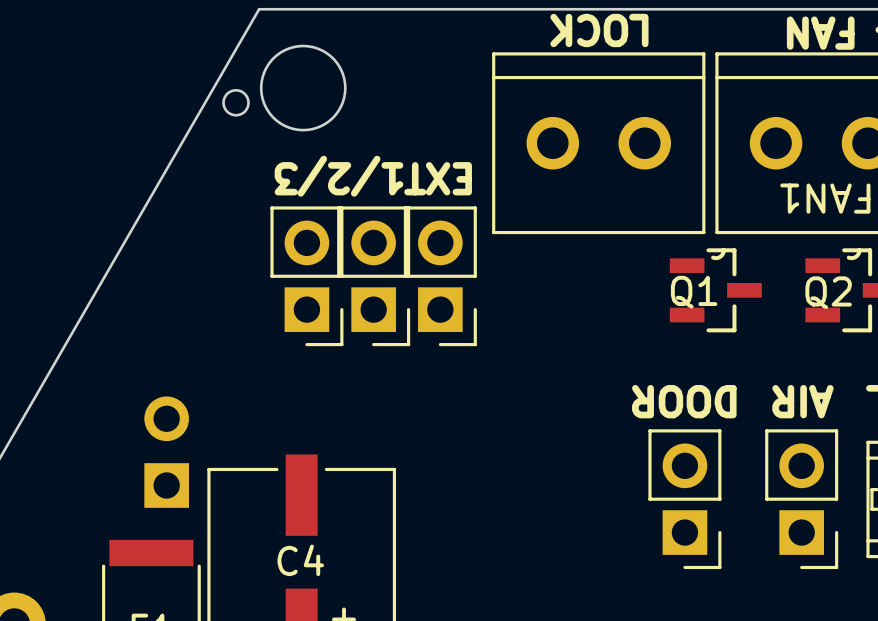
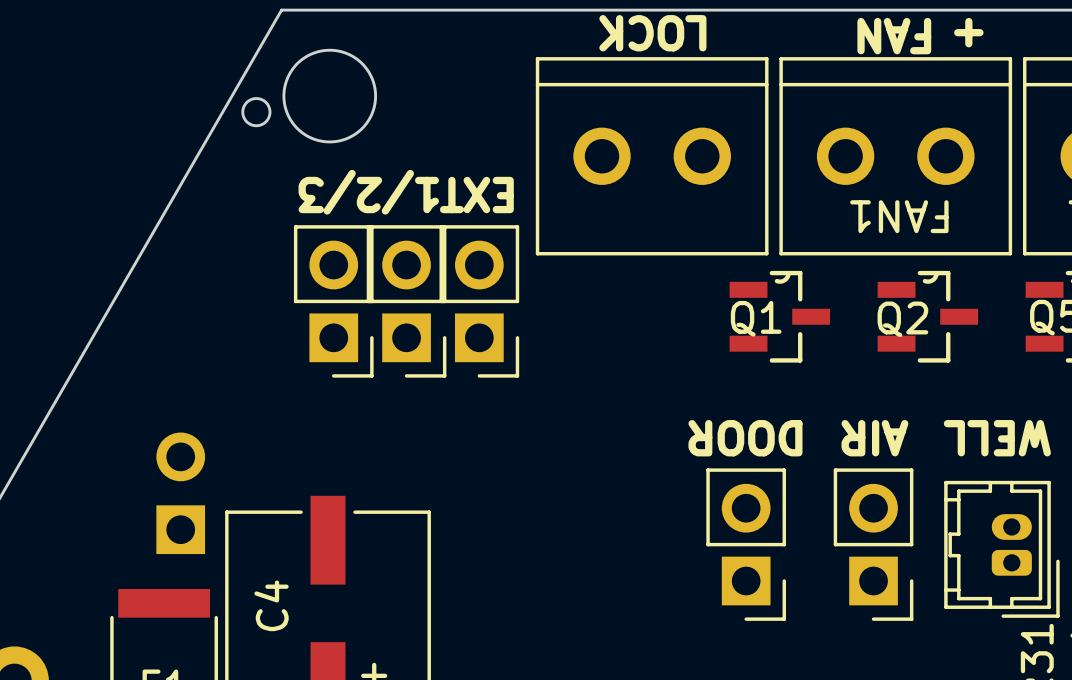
C4 name rotation: 0° (300, 560) -> 90° counterclockwise (271, 605)

